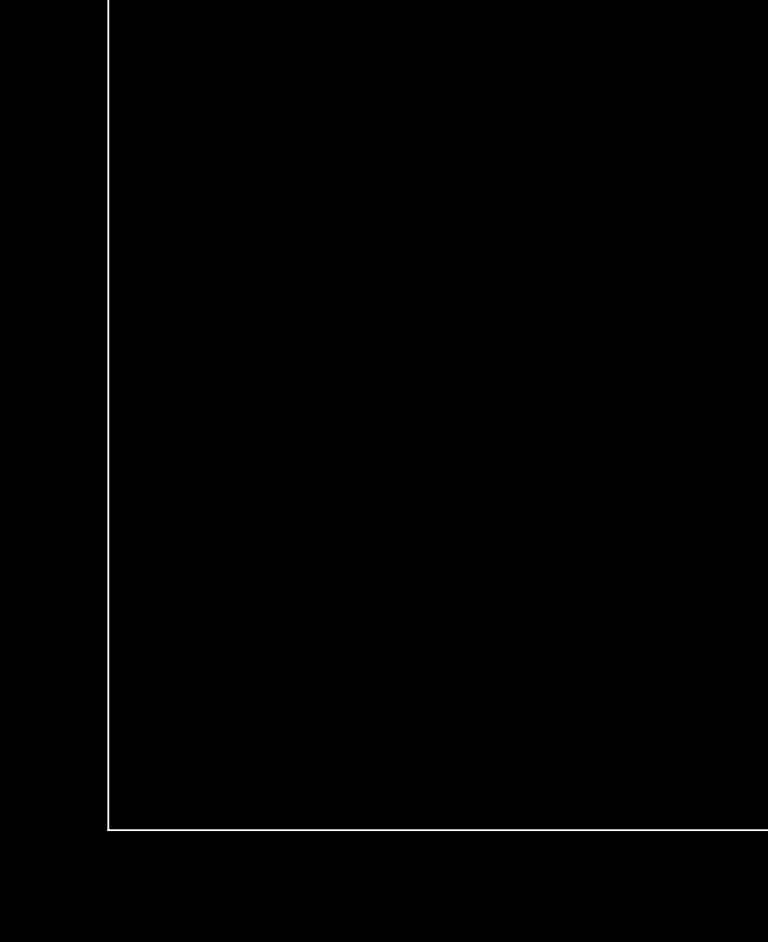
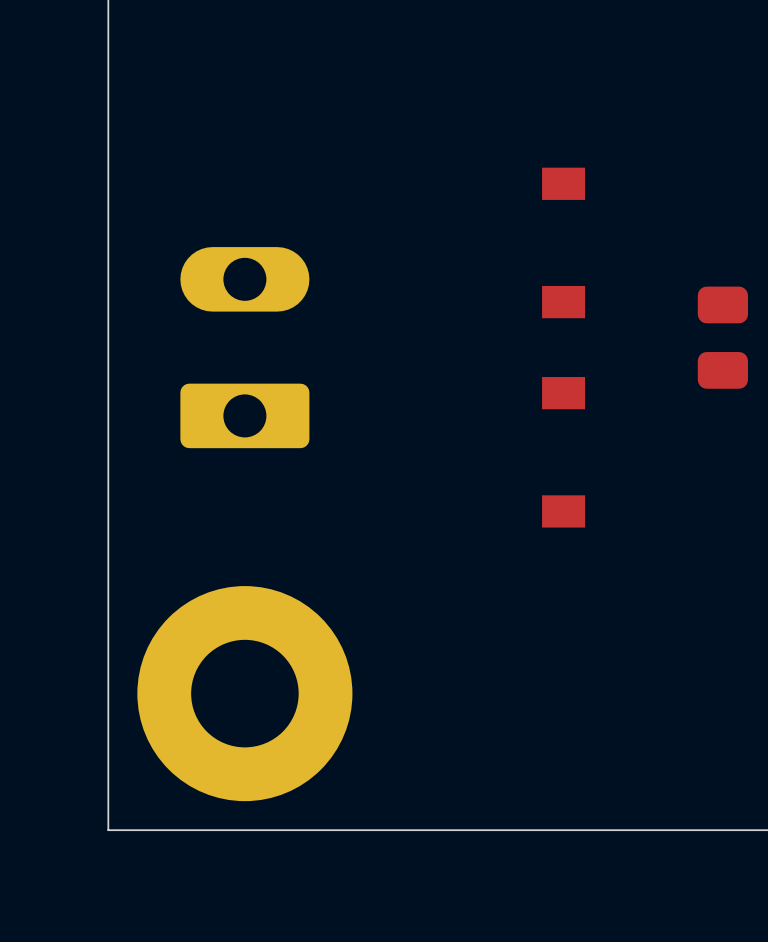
part: none -> (563, 242)
part: none -> (722, 337)
part: none -> (244, 347)
part: none -> (563, 452)
part: none -> (244, 693)

